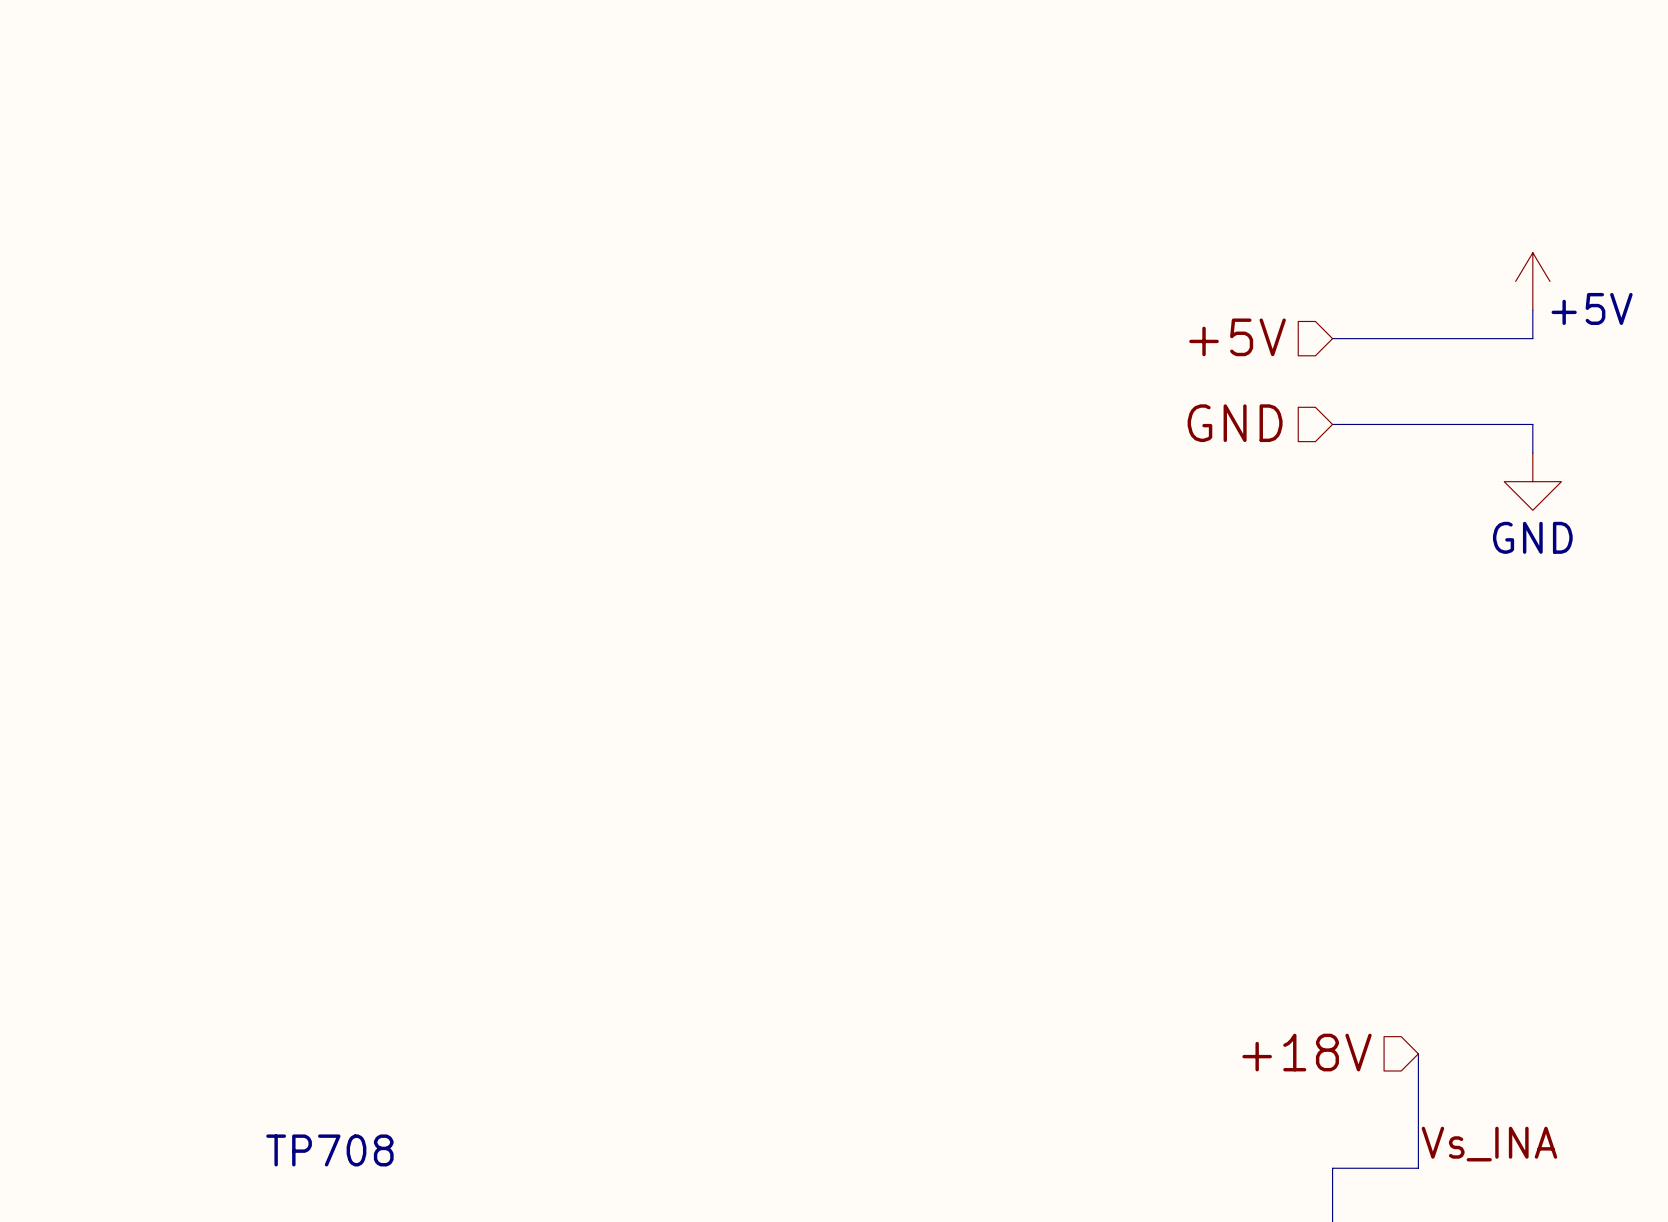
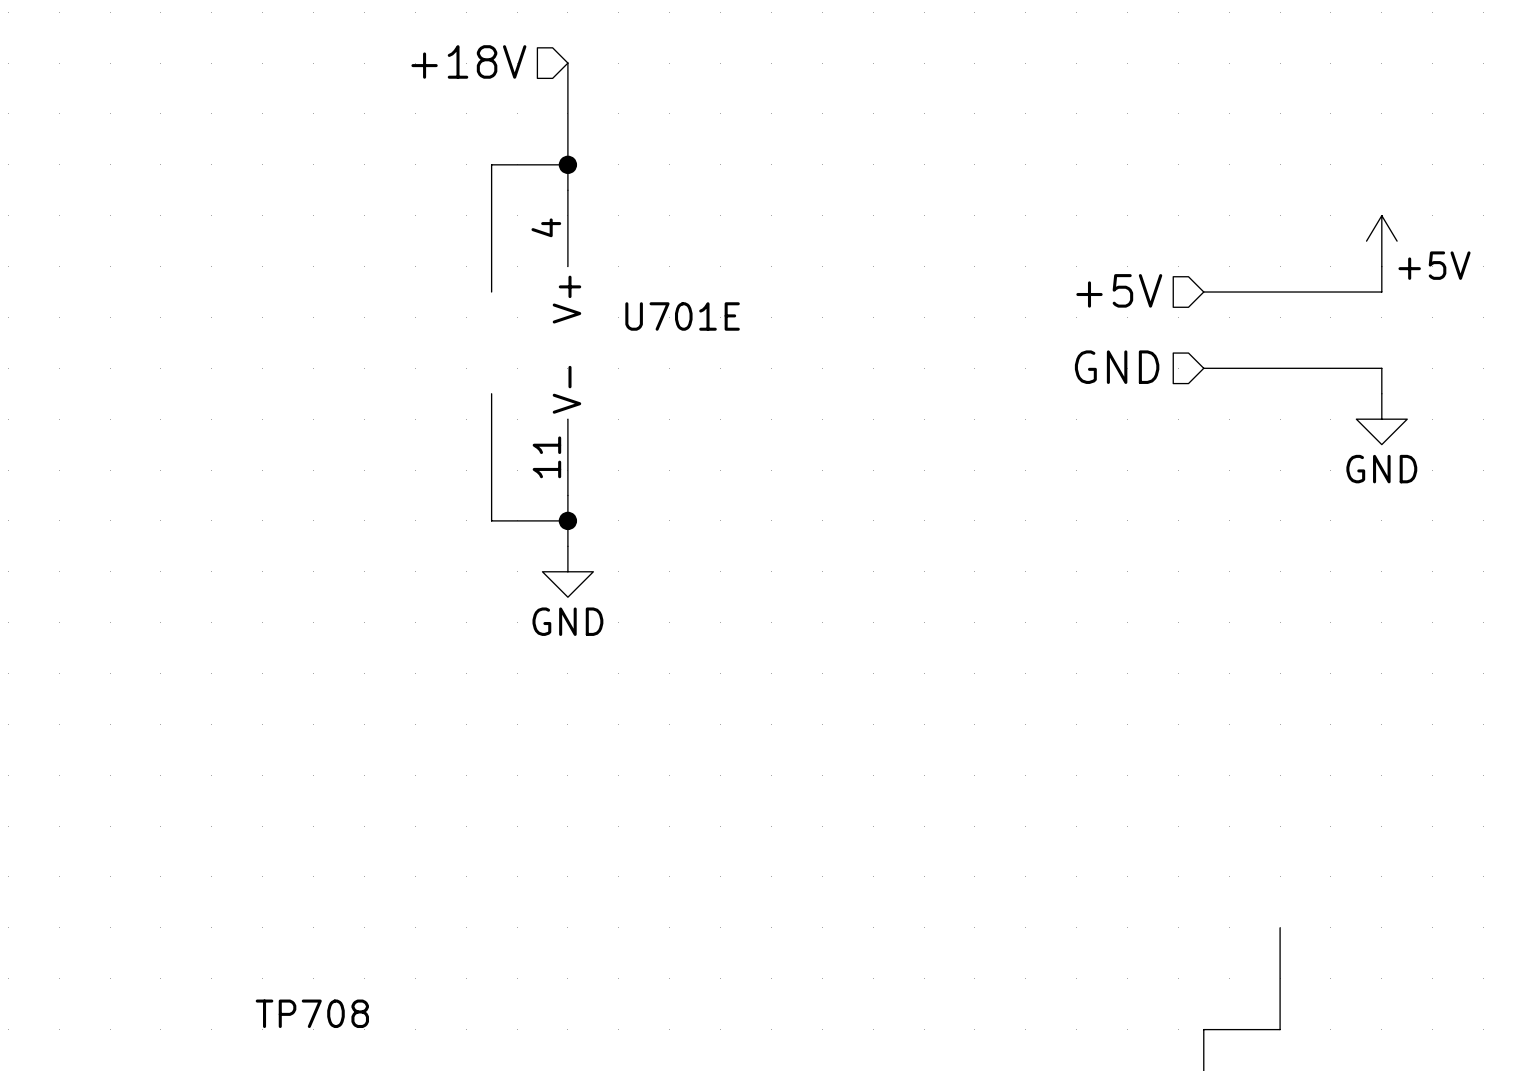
hierarchical label: none -> +18V (468, 61)
wire: none -> (567, 63) (567, 190)
wire: none -> (567, 164) (491, 164) (491, 292)
junction: none -> (567, 164)
U701E: none -> (567, 342)
wire: none -> (491, 393) (491, 520) (567, 520)
wire: none -> (567, 495) (567, 546)
junction: none -> (567, 520)
power symbol: none -> GND (567, 571)
hierarchical label: +18V (1307, 1052) -> none
label: Vs_INA (1489, 1144) -> none

